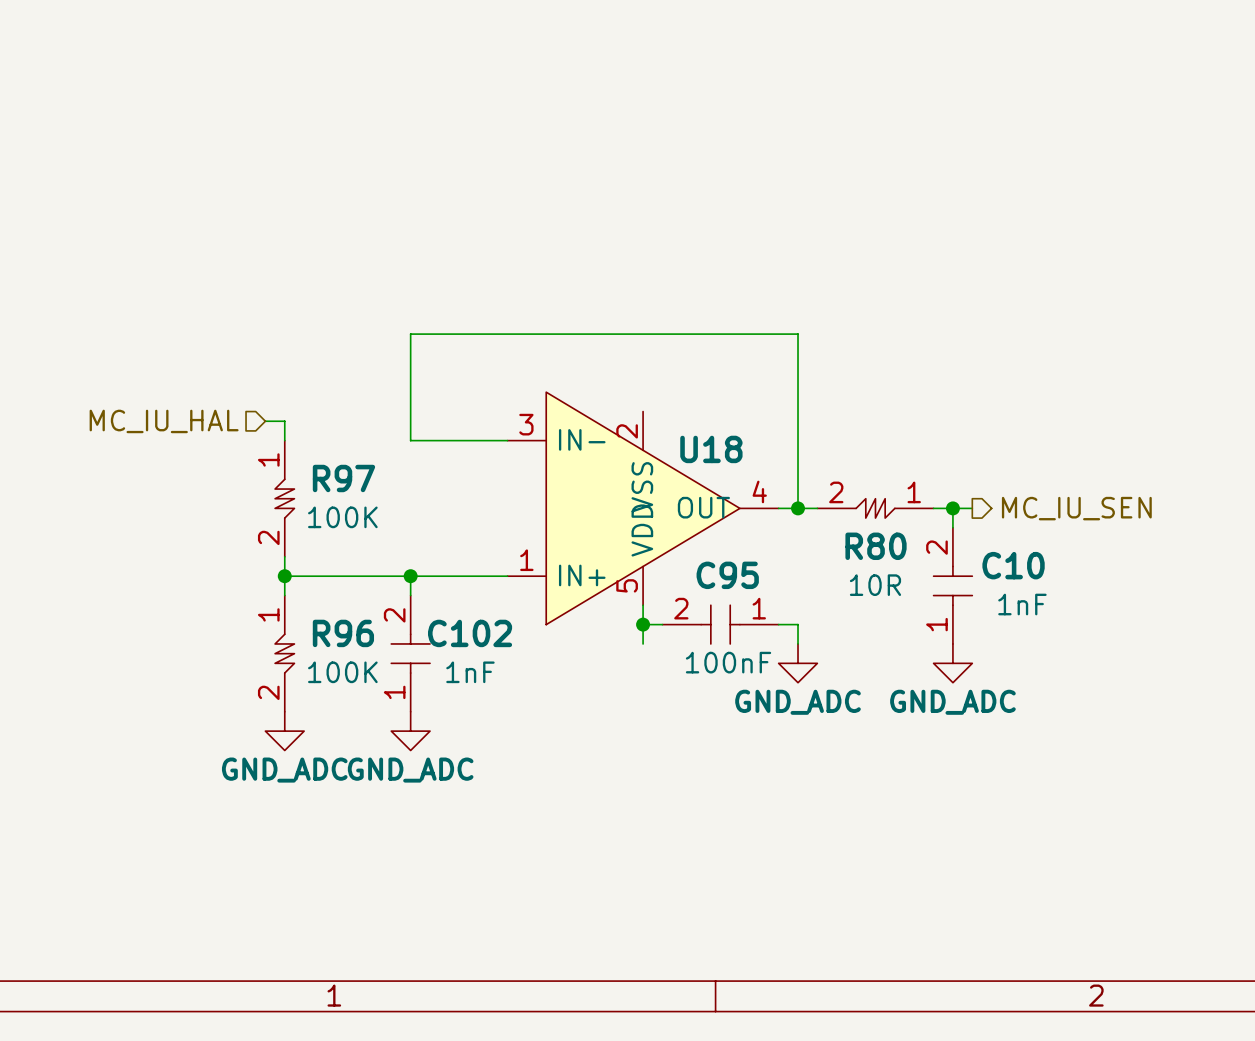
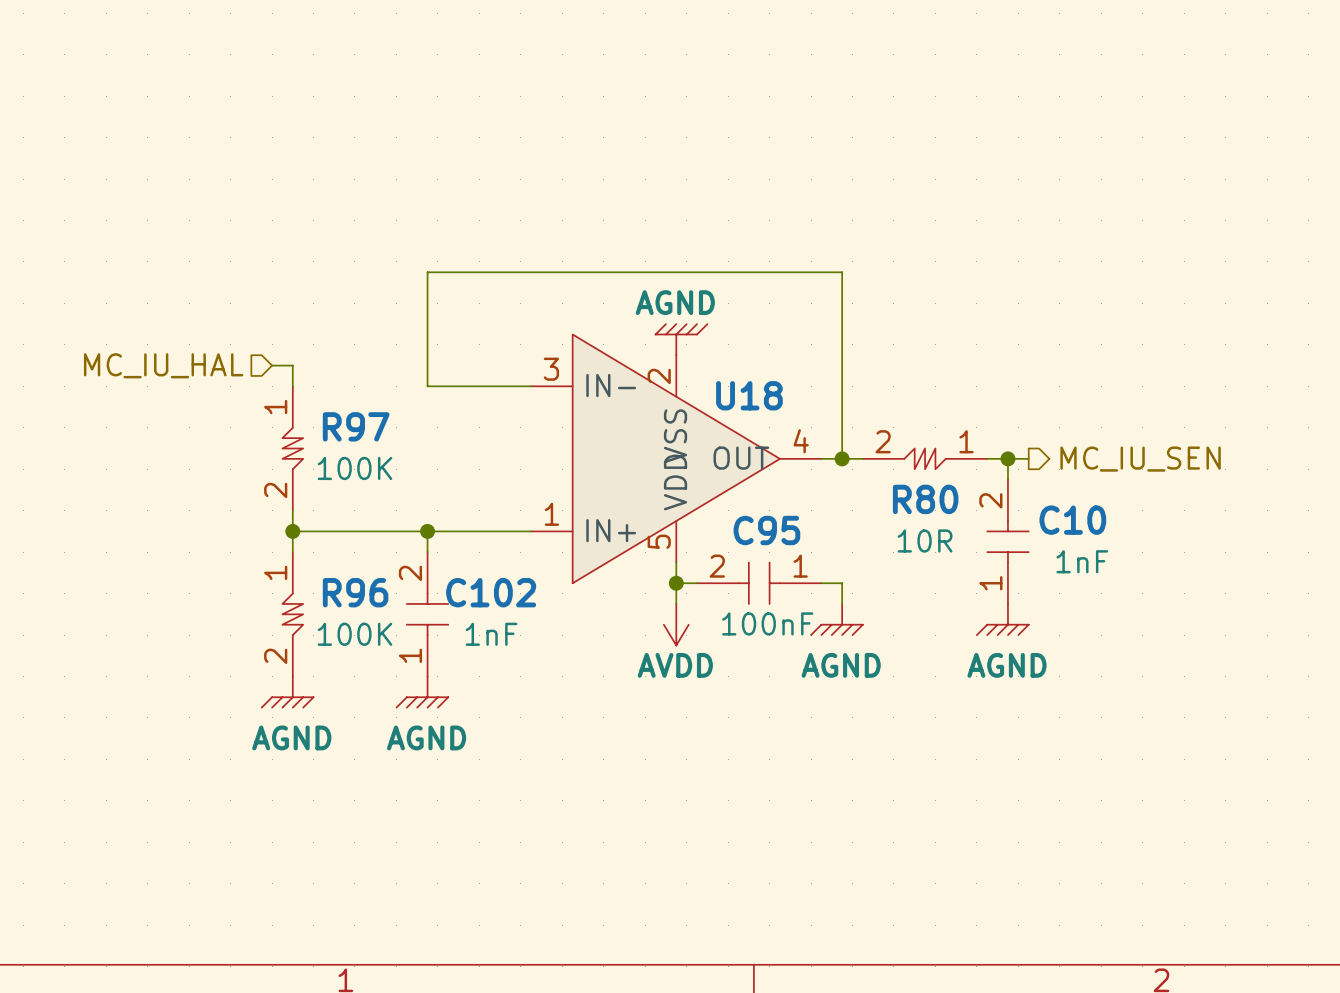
power symbol: none -> AGND (681, 339)
power symbol: none -> AVDD (676, 624)
power symbol: GND_ADC (798, 663) -> AGND (836, 619)
power symbol: GND_ADC (952, 663) -> AGND (1002, 619)
power symbol: GND_ADC (284, 731) -> AGND (287, 692)
power symbol: GND_ADC (410, 731) -> AGND (422, 692)

